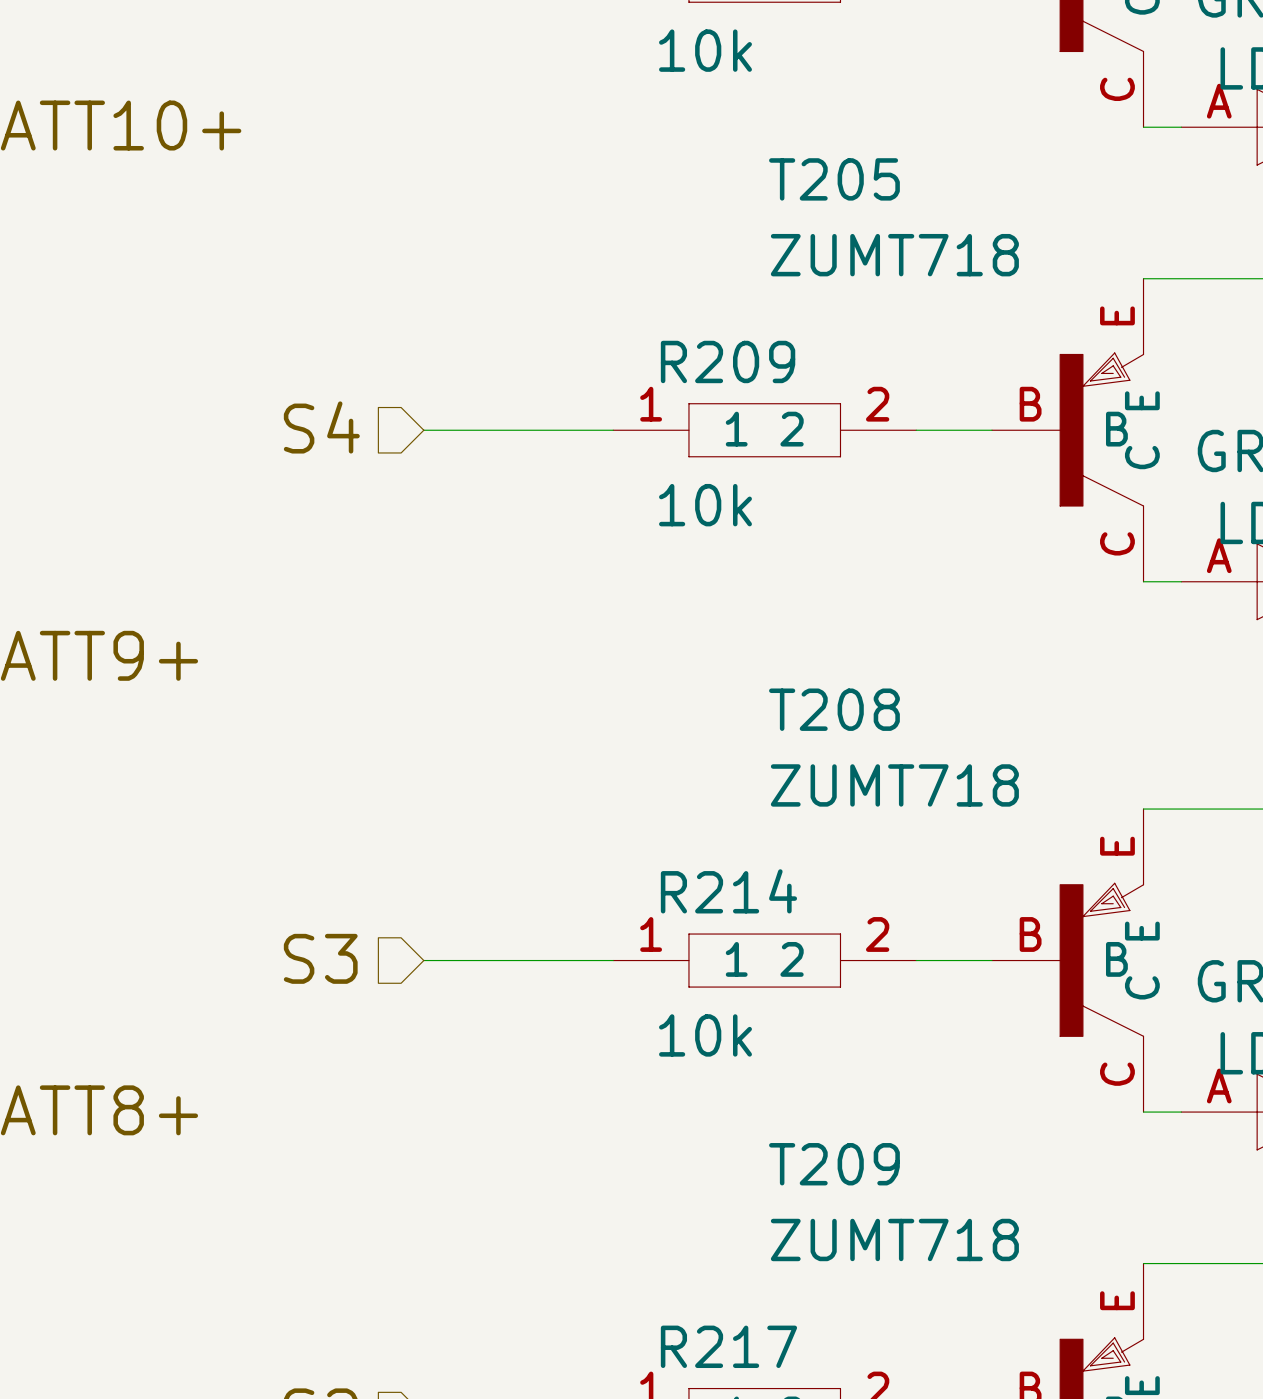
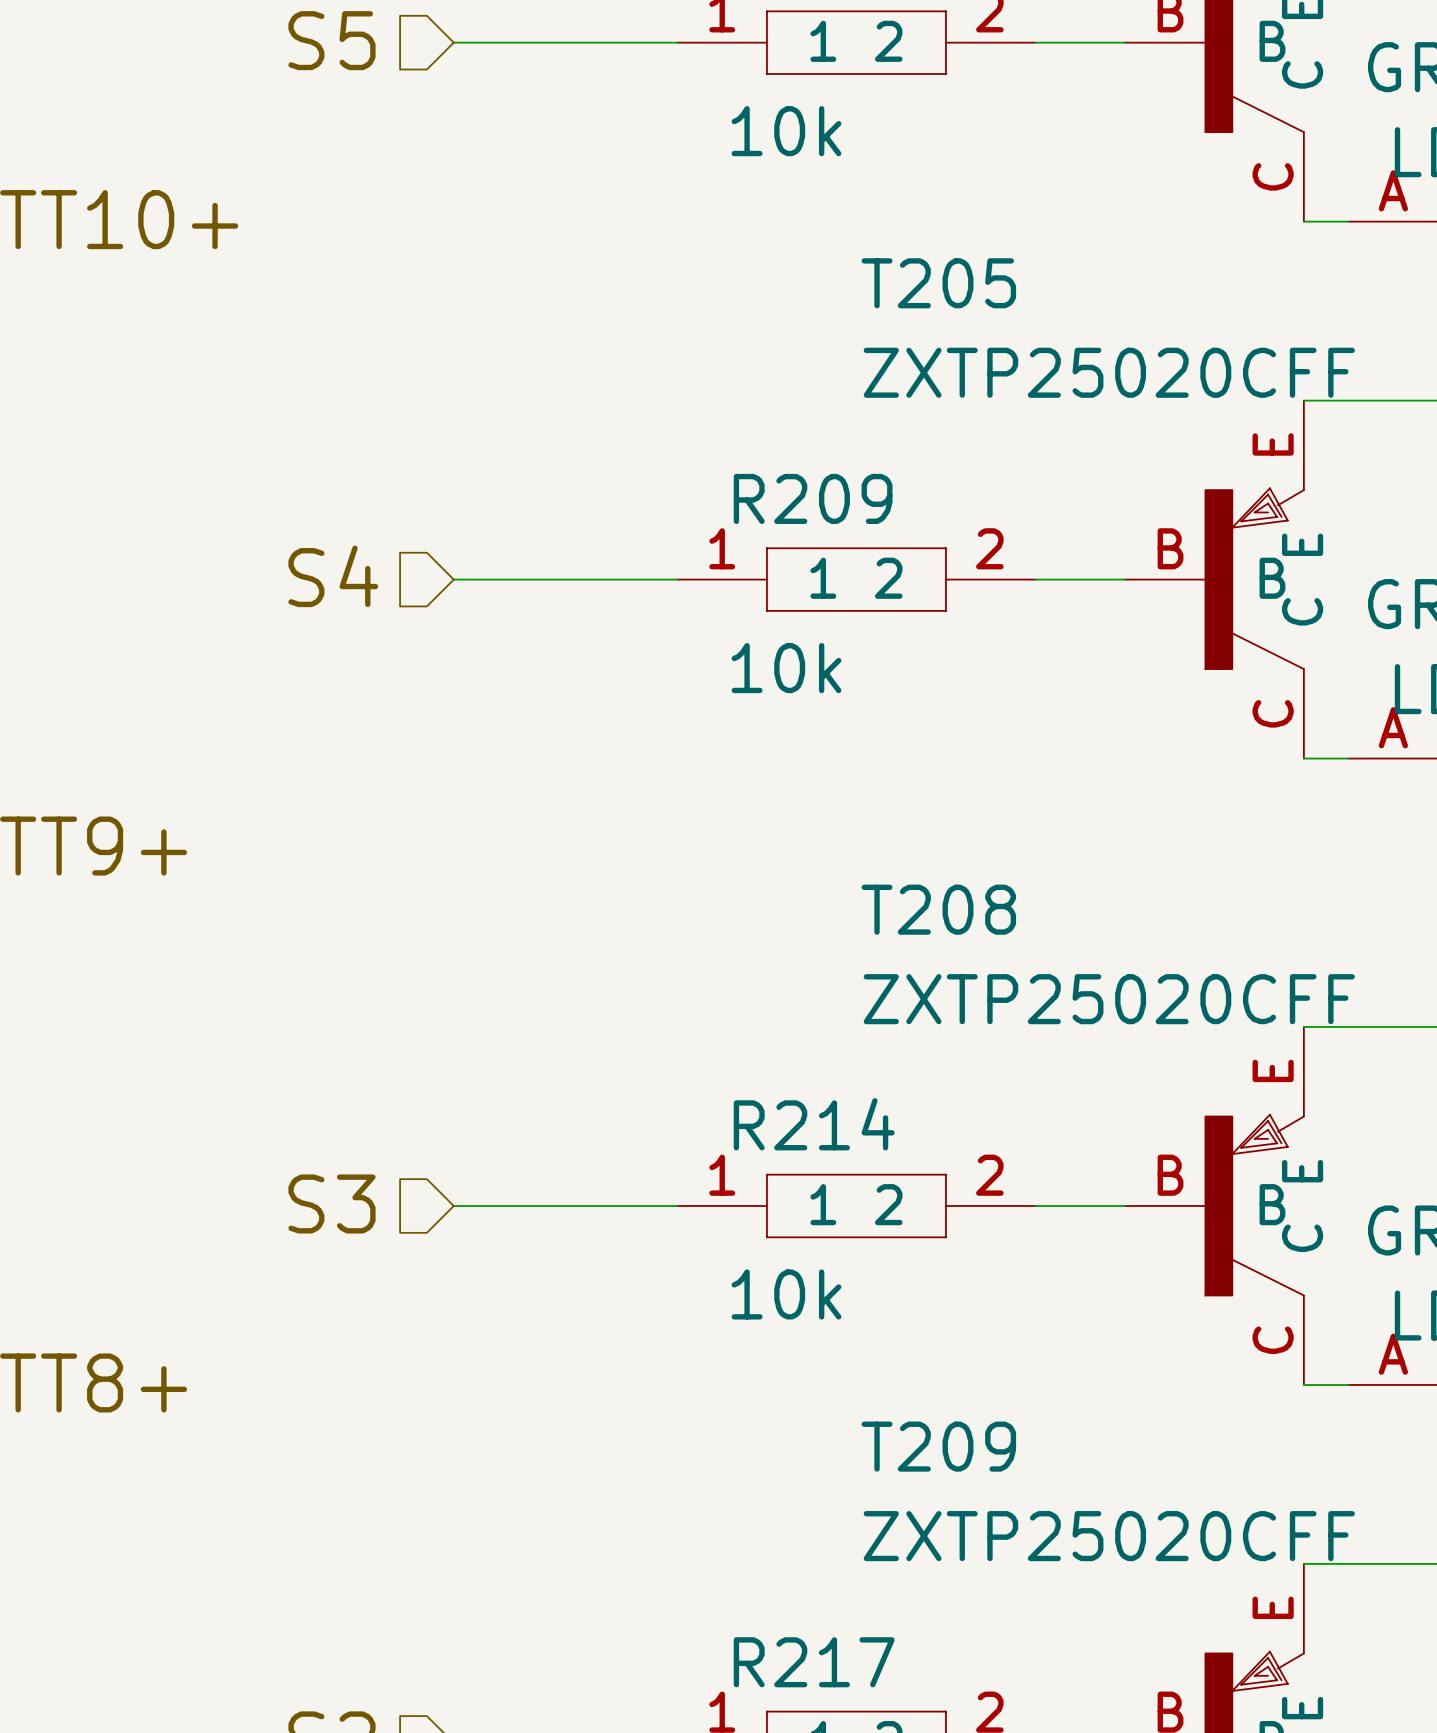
T205 value: ZUMT718 (894, 255) -> ZXTP25020CFF (1109, 372)
T208 value: ZUMT718 (894, 785) -> ZXTP25020CFF (1109, 999)
T209 value: ZUMT718 (894, 1239) -> ZXTP25020CFF (1109, 1536)

